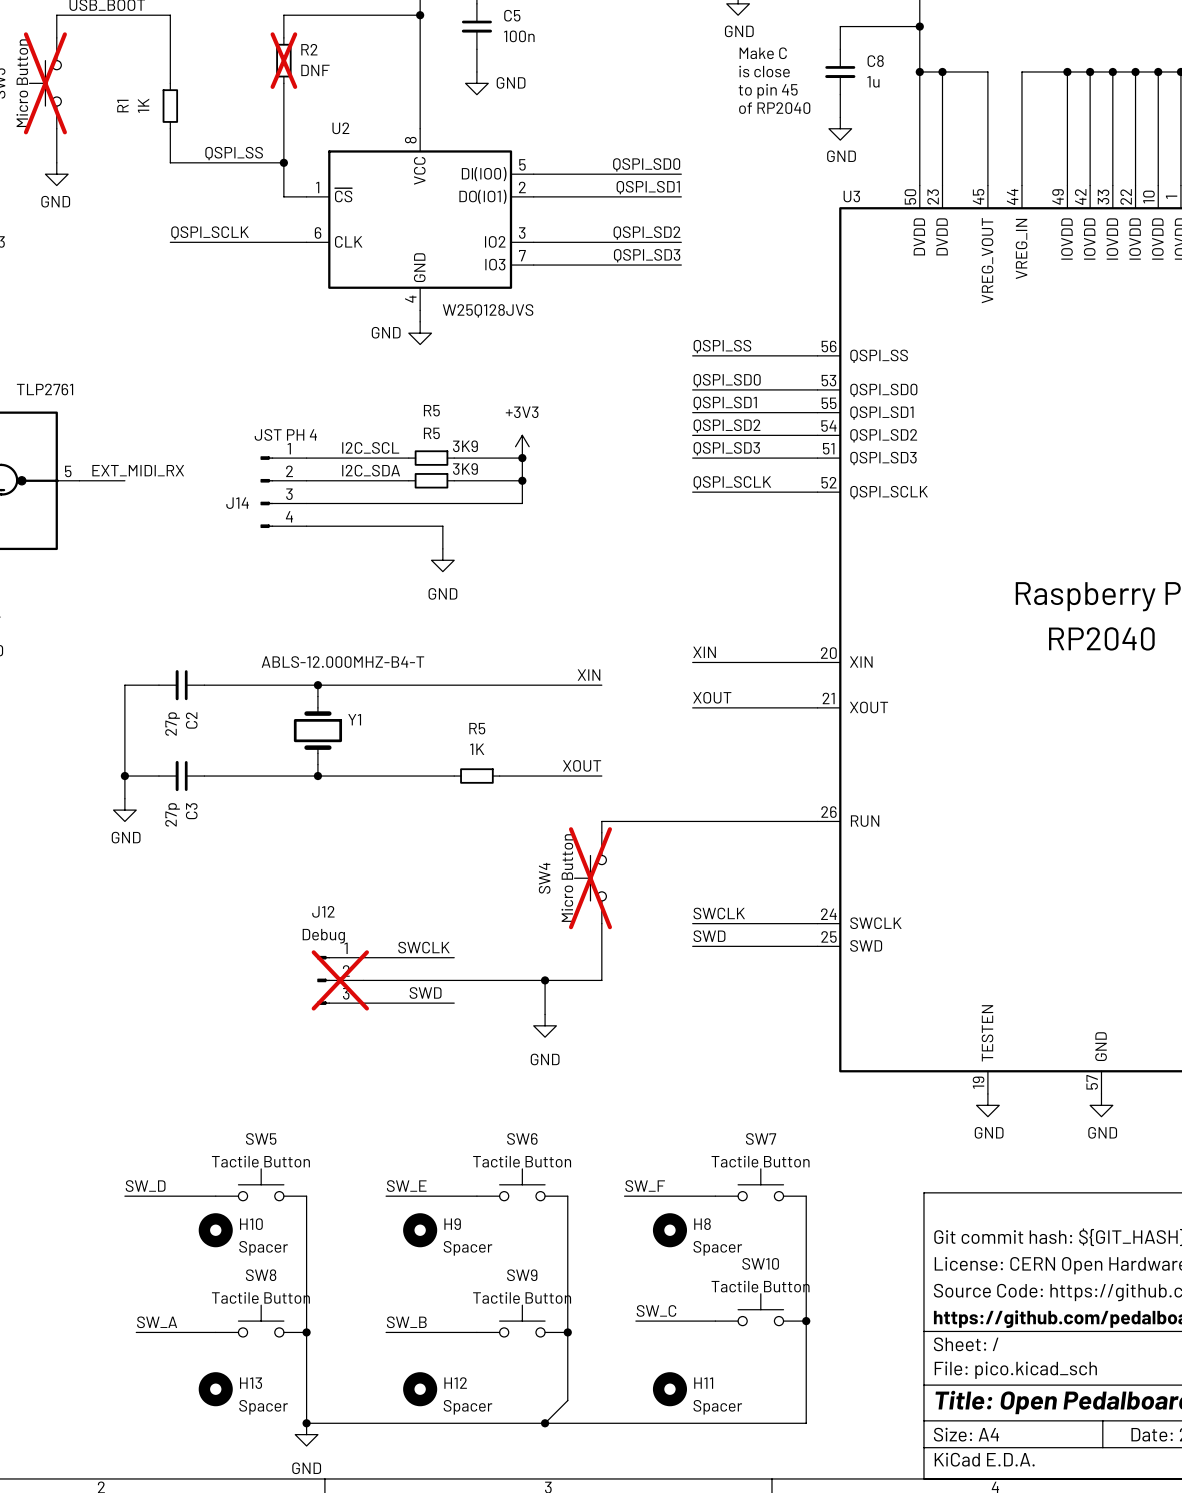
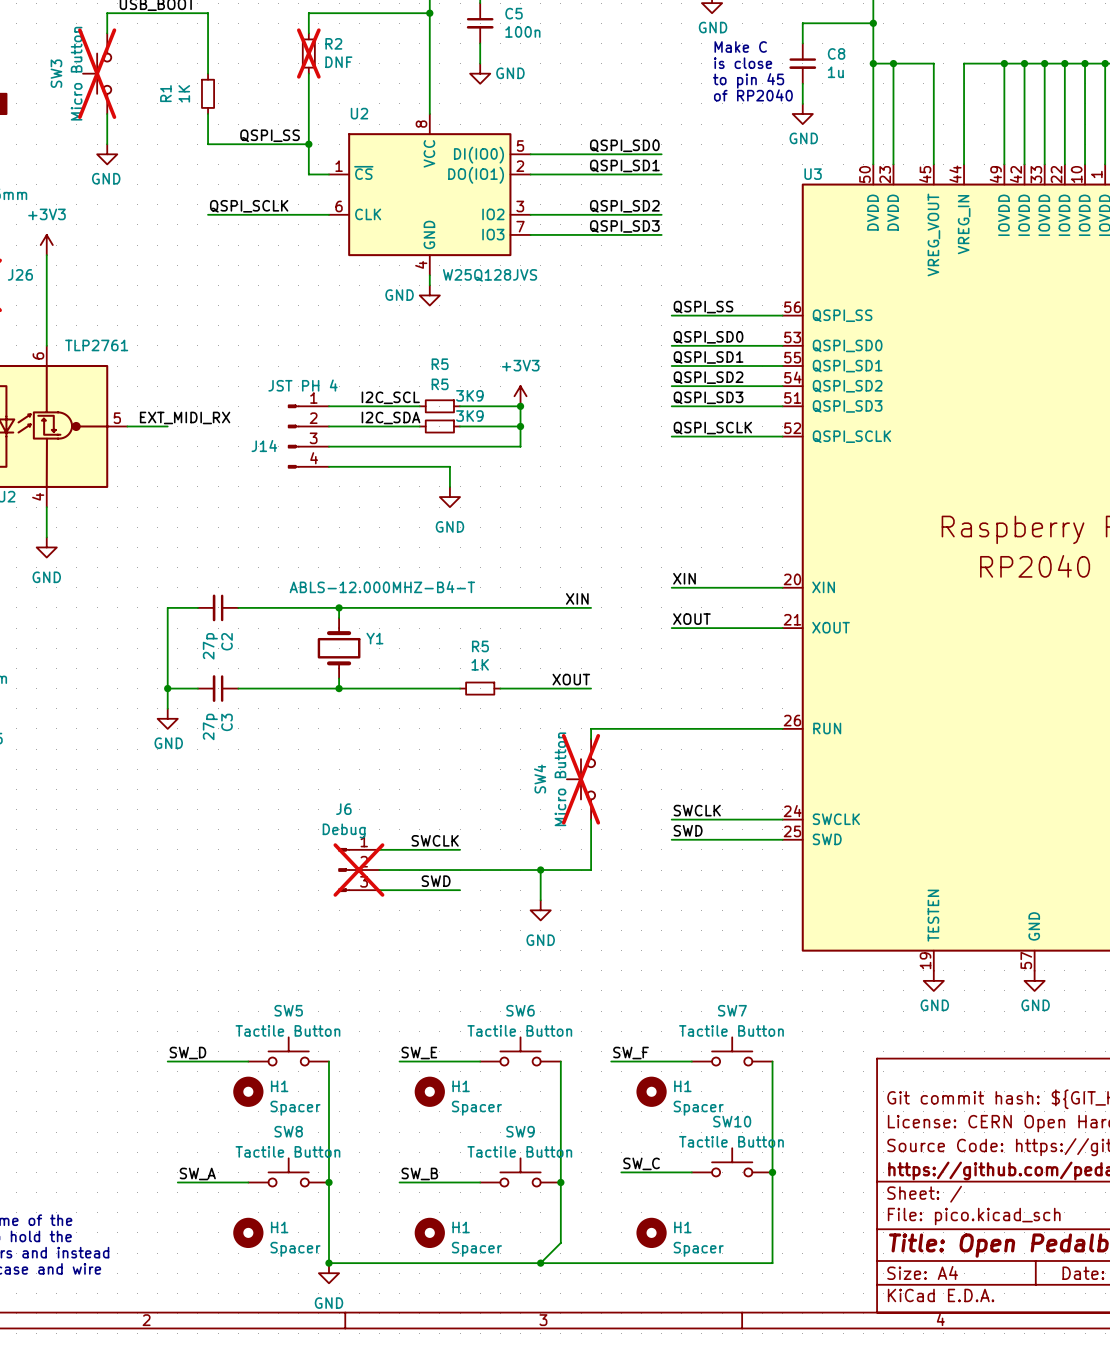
J12 name: J12 (323, 911) -> J6 (343, 809)
H10 name: H10 (251, 1224) -> H1 (279, 1086)
H9 name: H9 (452, 1224) -> H1 (461, 1086)
H8 name: H8 (702, 1224) -> H1 (682, 1086)
H13 name: H13 (251, 1383) -> H1 (279, 1227)
H12 name: H12 (455, 1383) -> H1 (461, 1227)
H11 name: H11 (703, 1383) -> H1 (682, 1227)

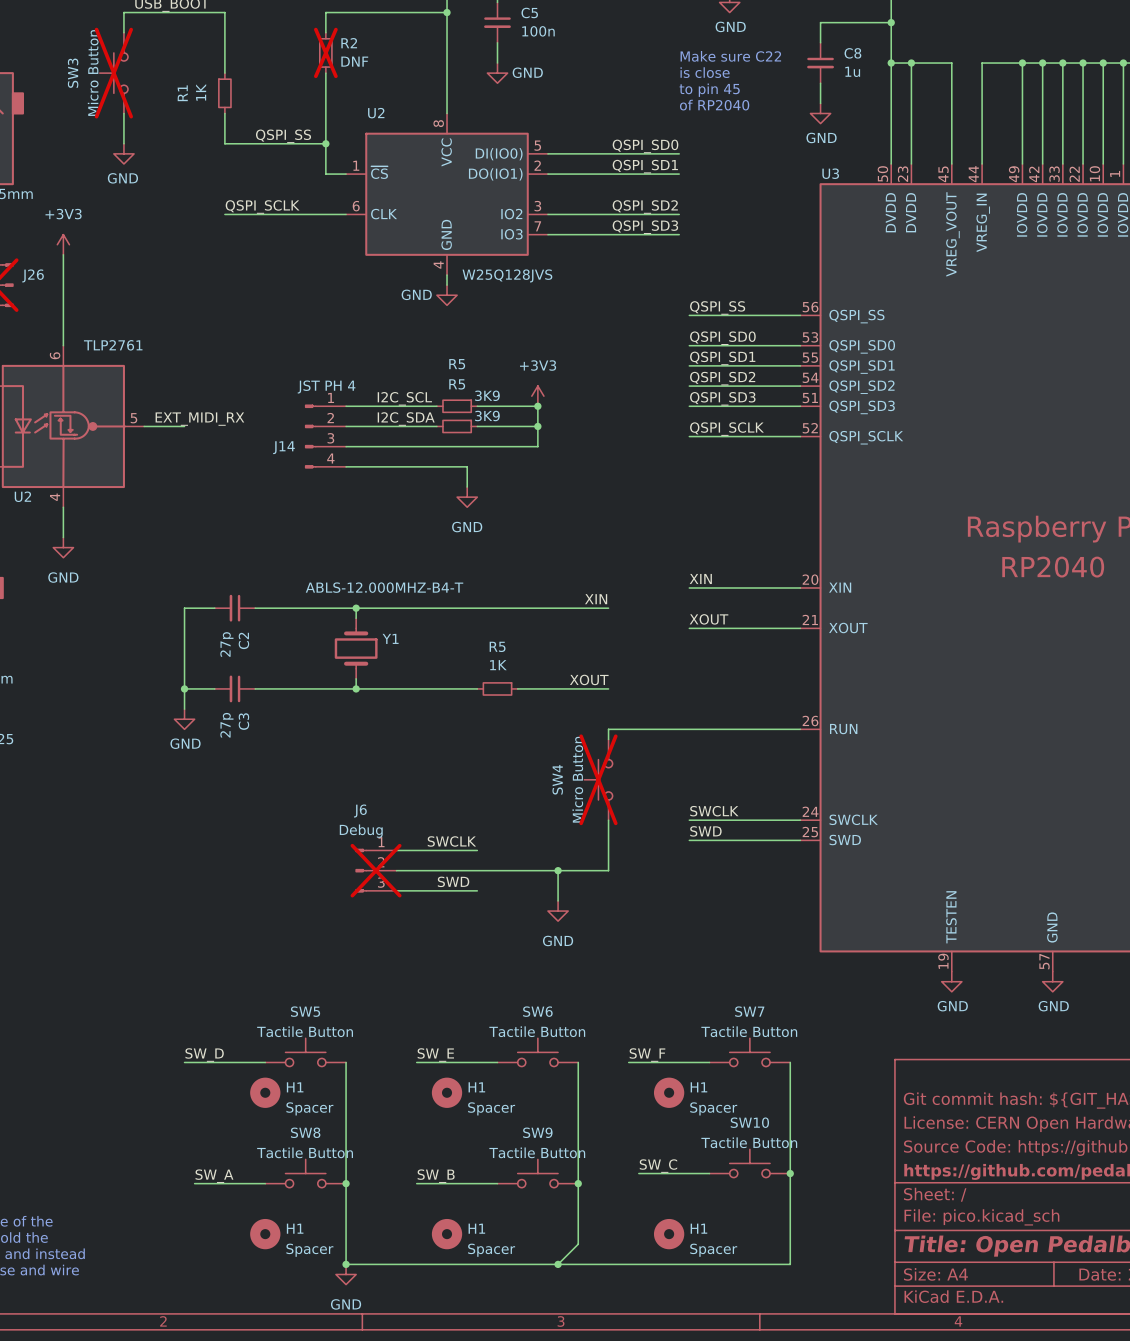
text: Make C (740, 46) -> Make sure C22 (730, 56)
text position: is close (743, 63) -> is close (705, 72)
text position: to pin 45 (748, 80) -> to pin 45 (709, 90)
text position: of RP2040 (753, 95) -> of RP2040 (714, 105)

